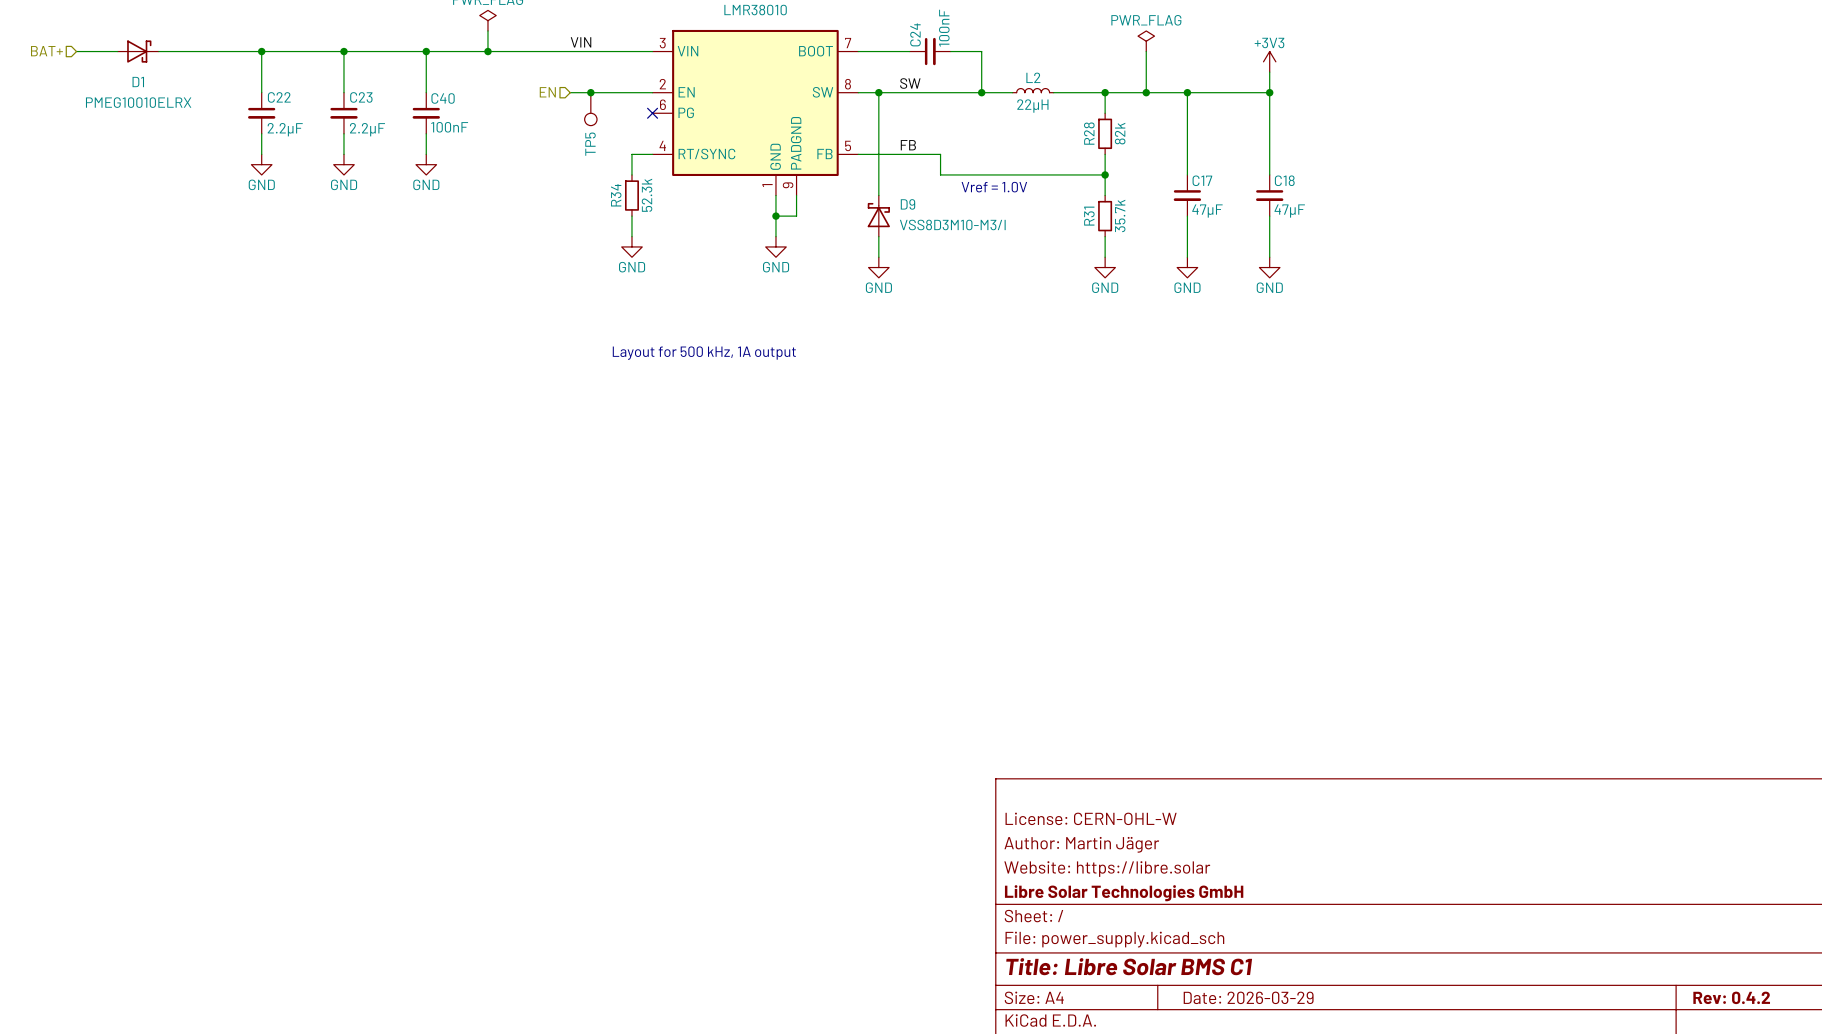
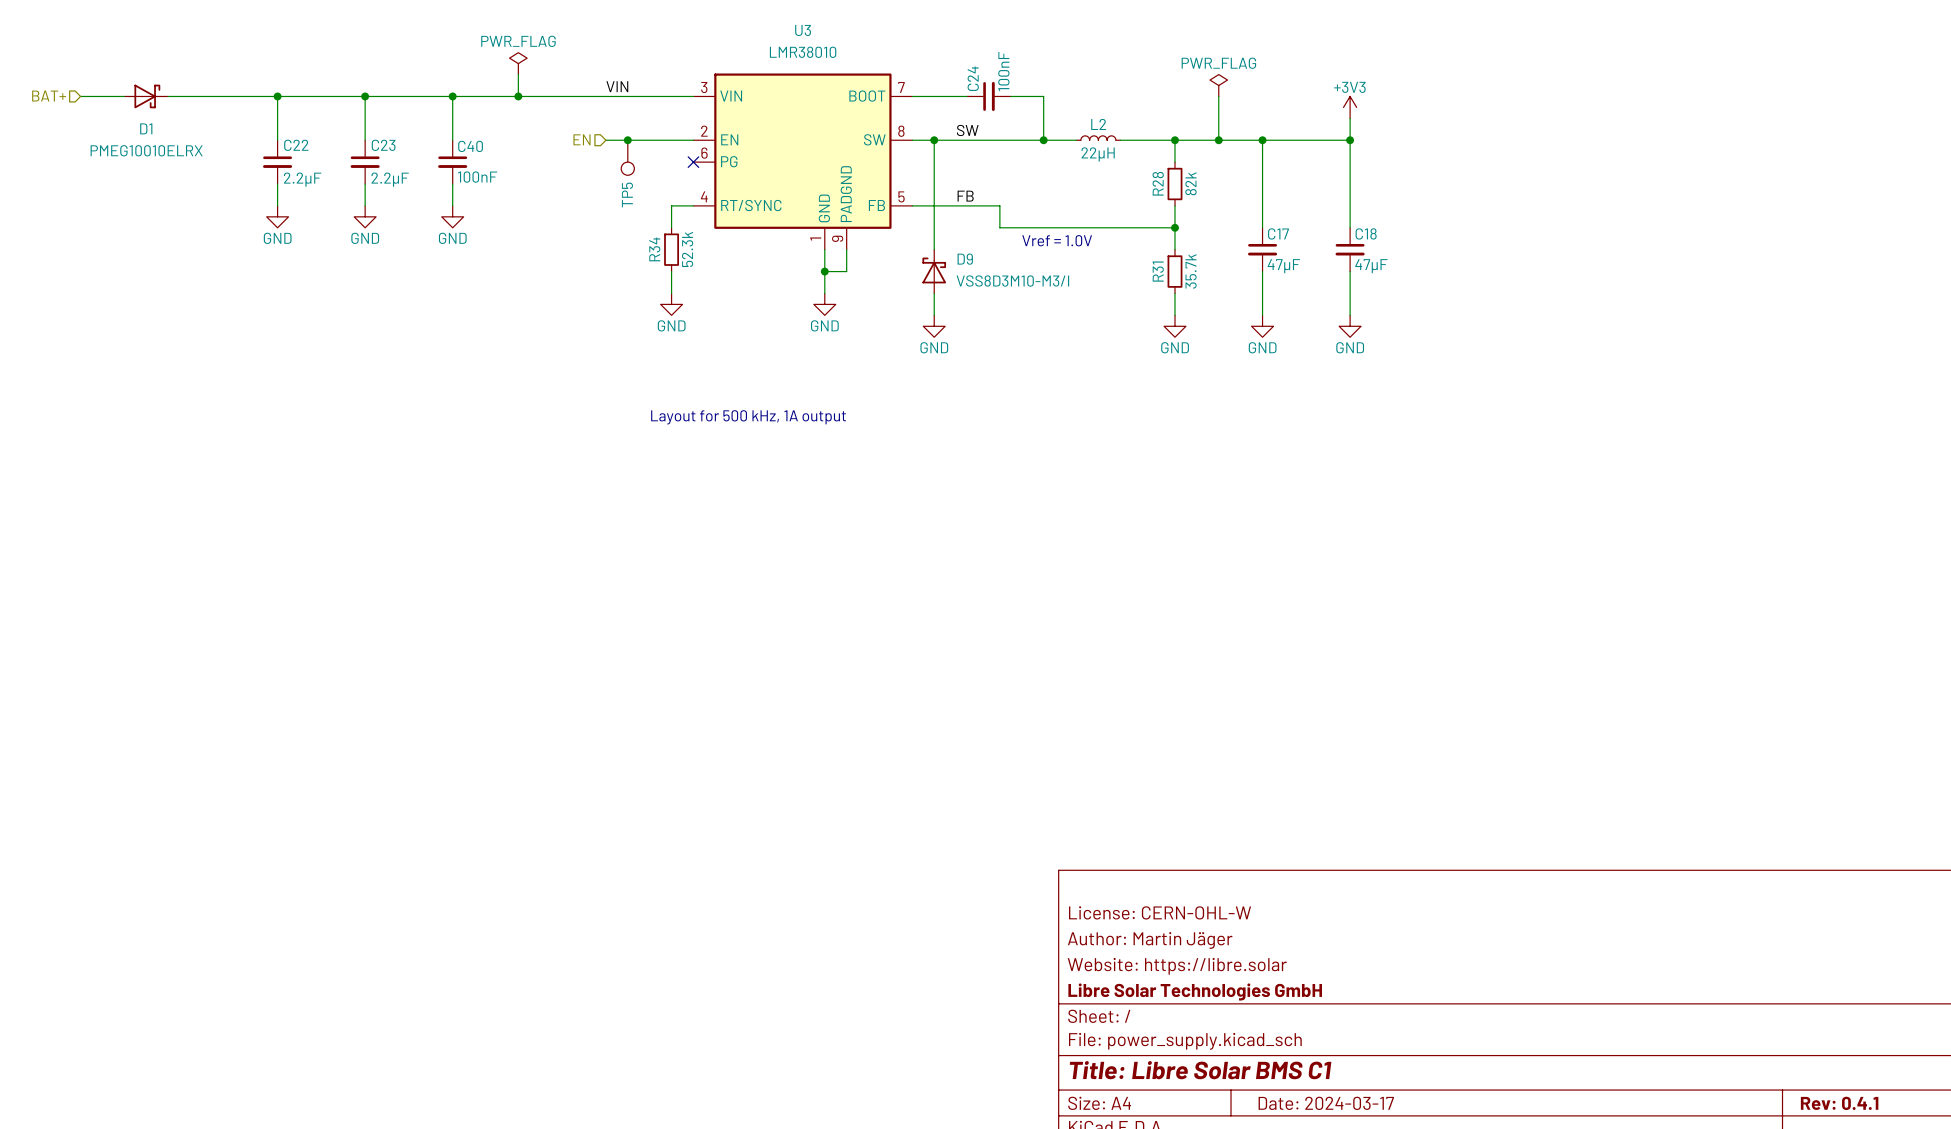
title block: Date: 2026-03-29 (1248, 997) -> Date: 2024-03-17 (1326, 1103)
title block: Rev: 0.4.2 (1731, 997) -> Rev: 0.4.1 (1839, 1103)

